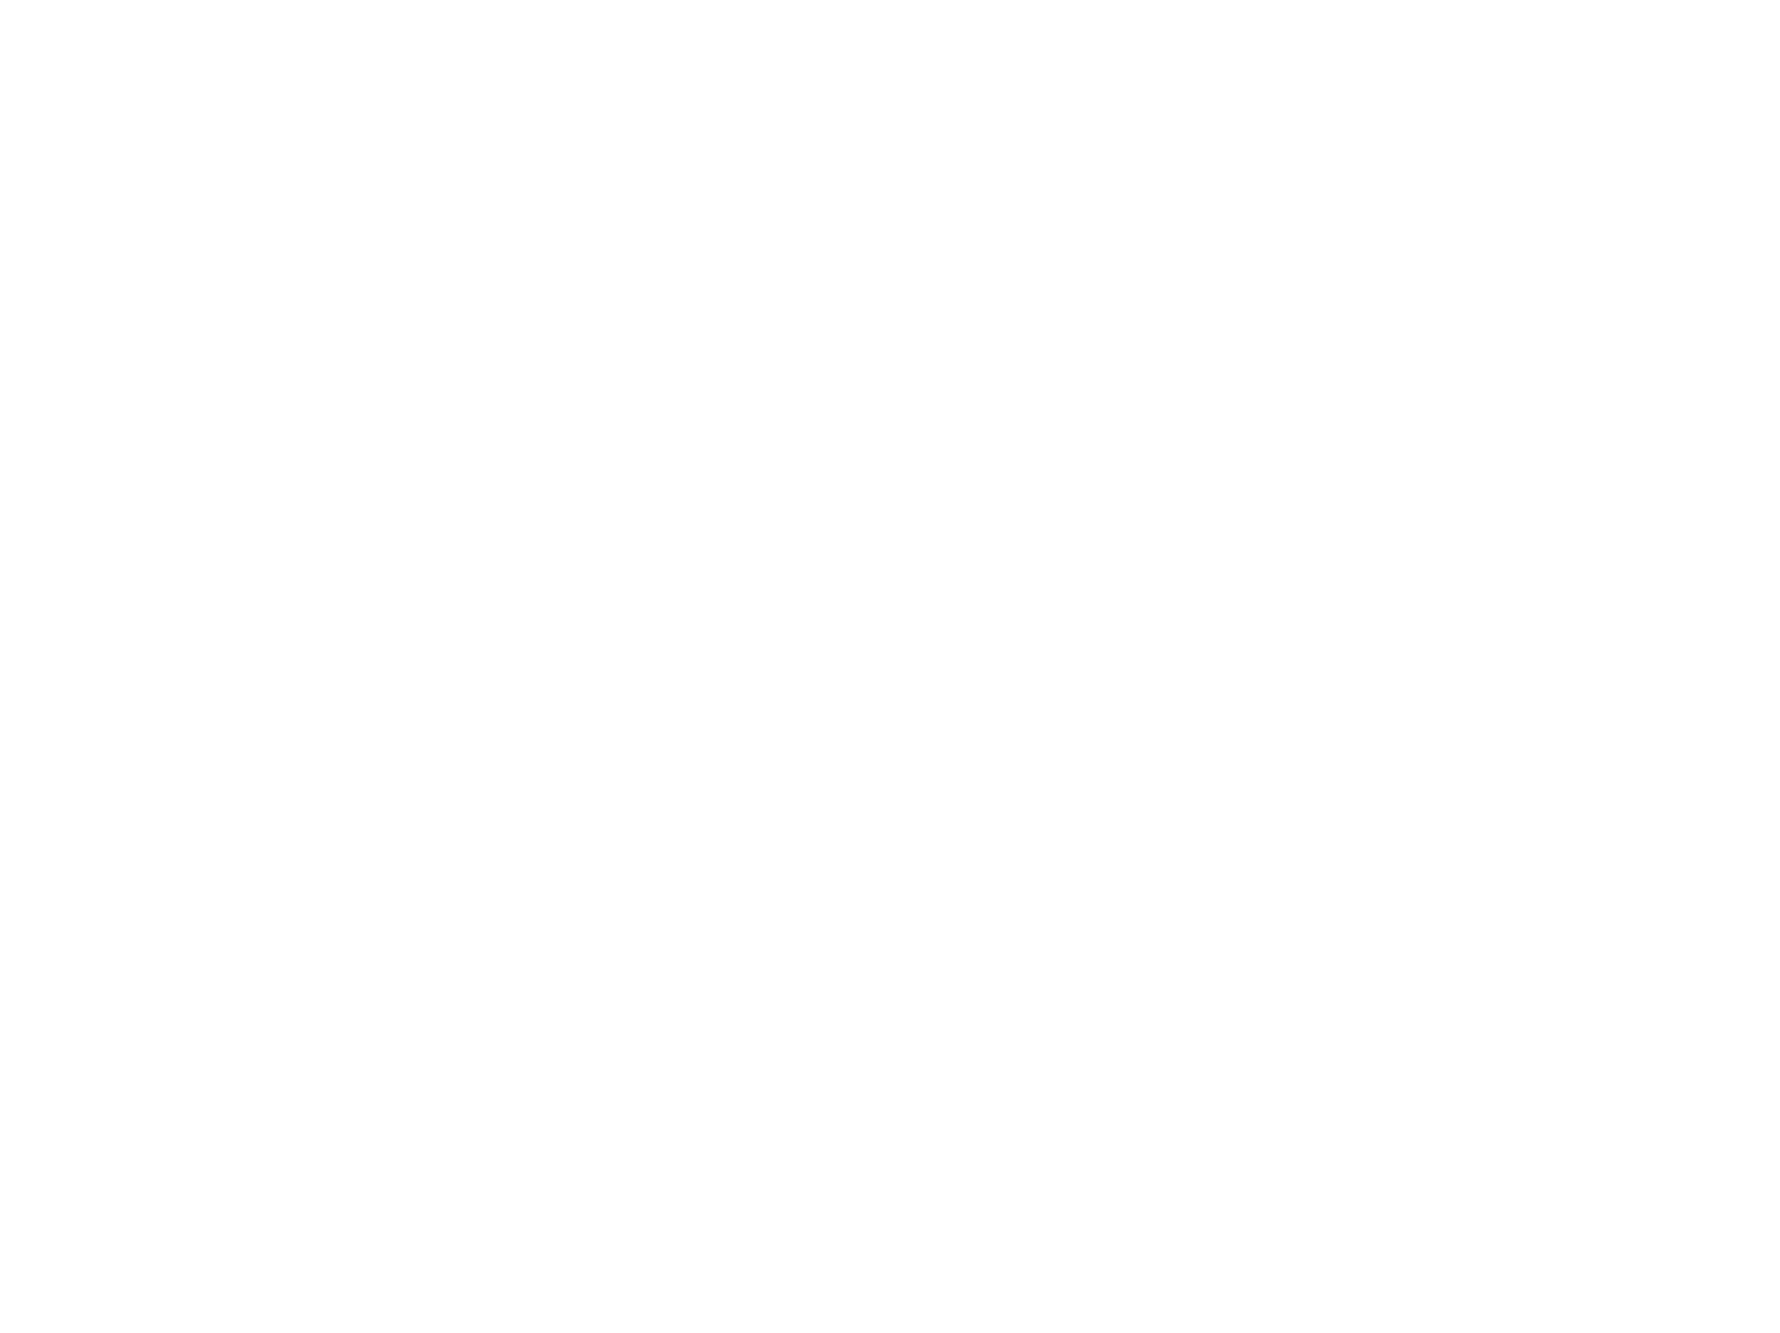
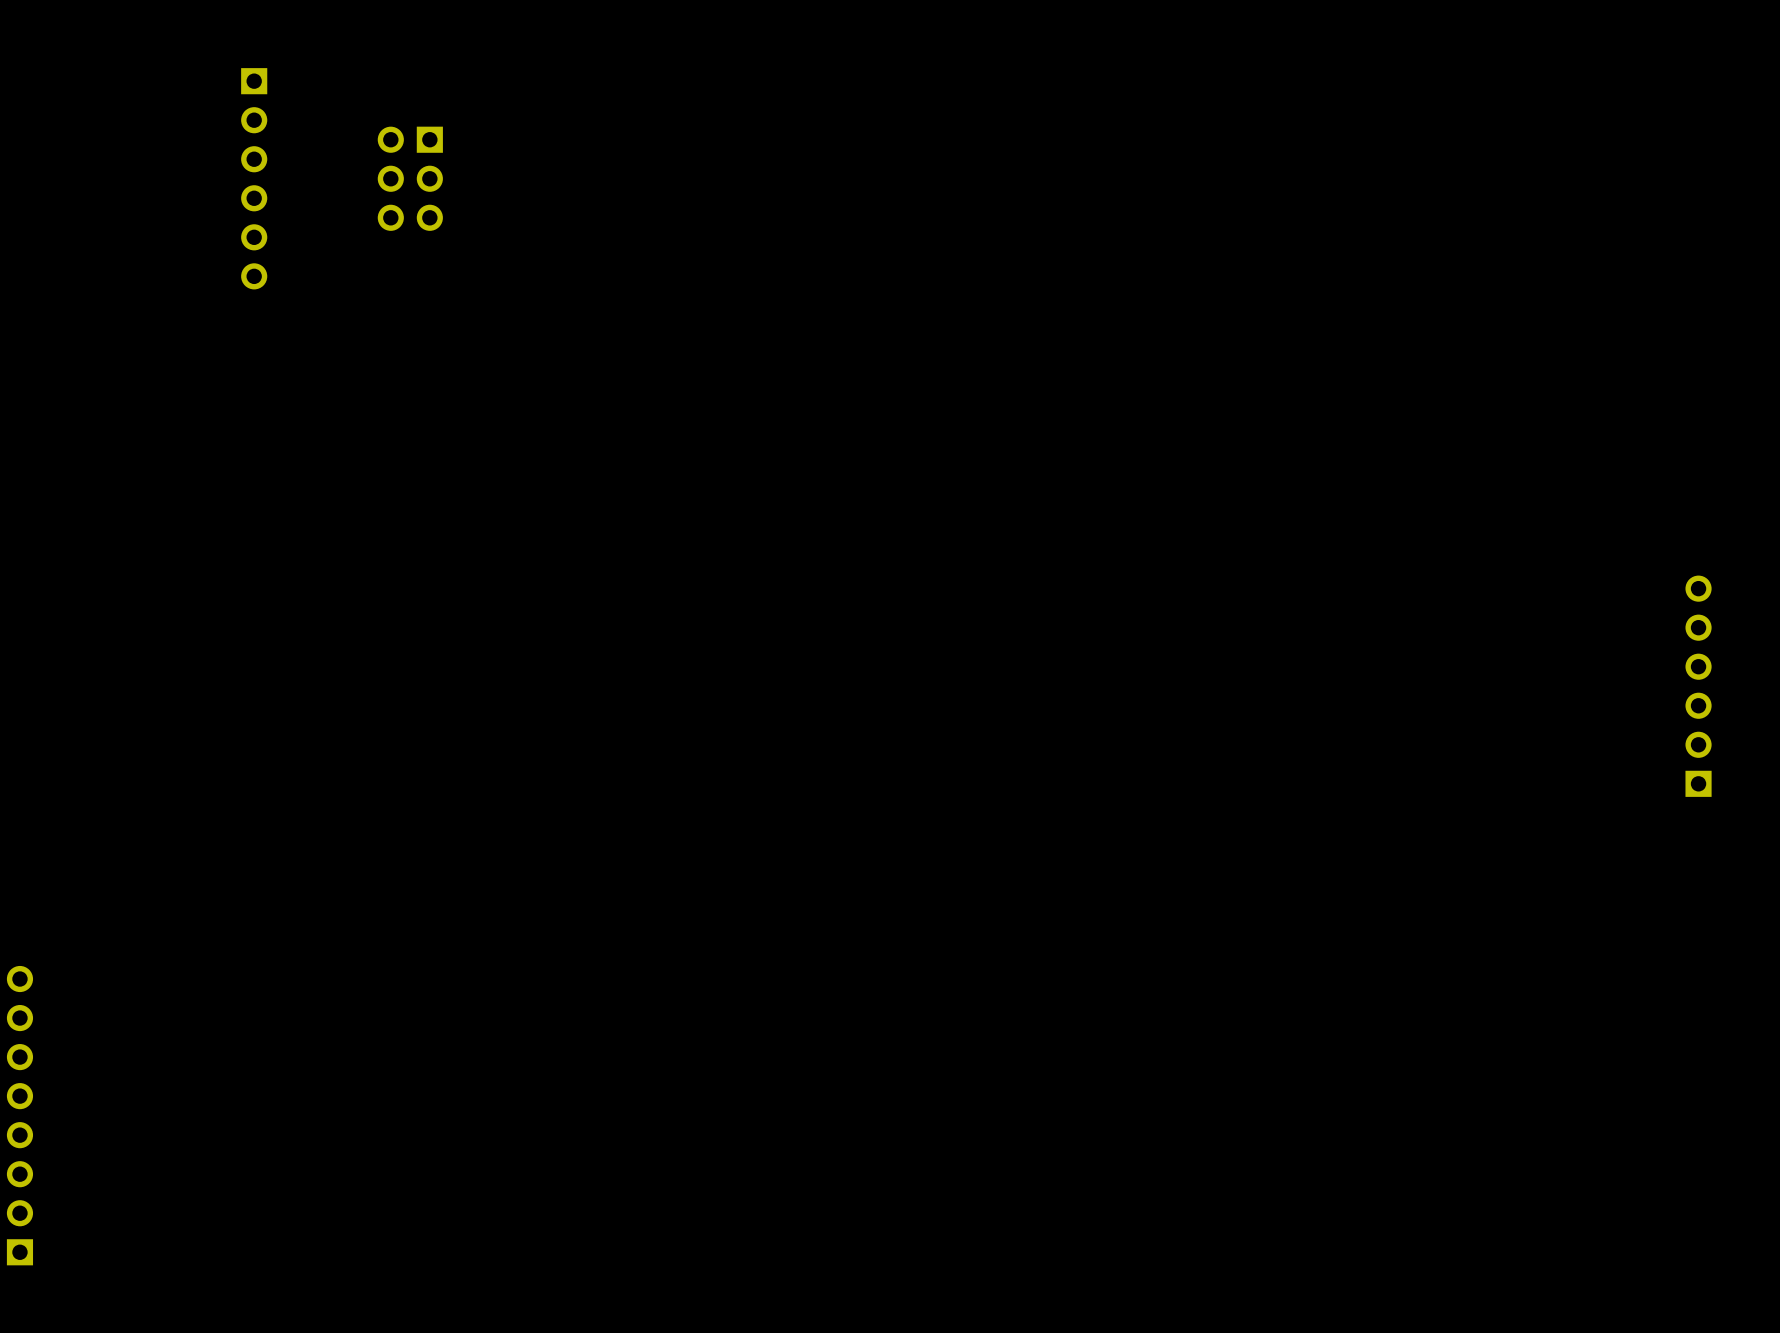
part: none -> (254, 178)
part: none -> (410, 178)
part: none -> (1698, 686)
part: none -> (19, 1115)

